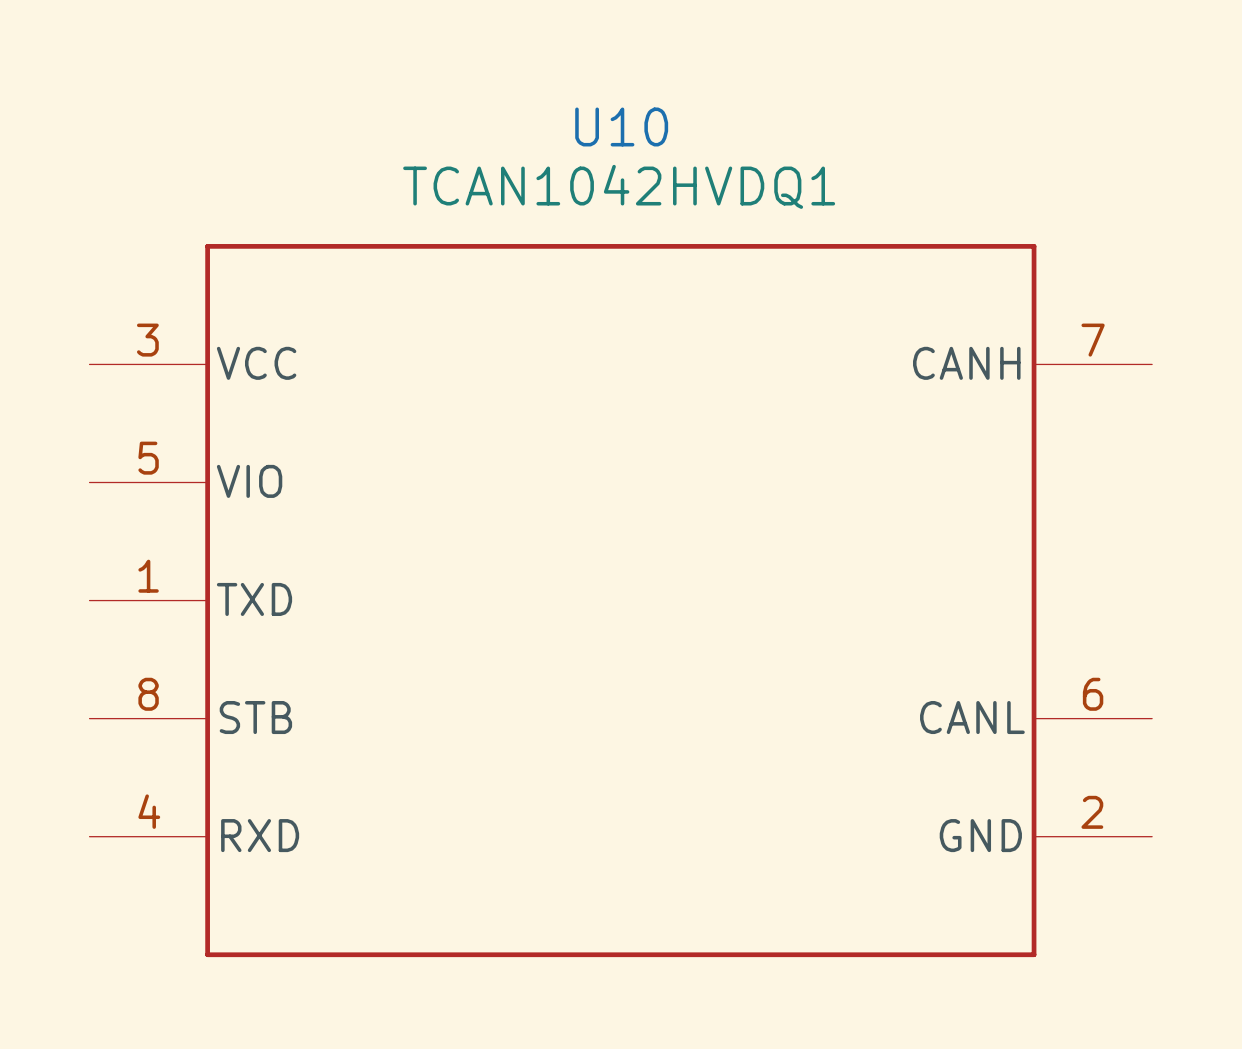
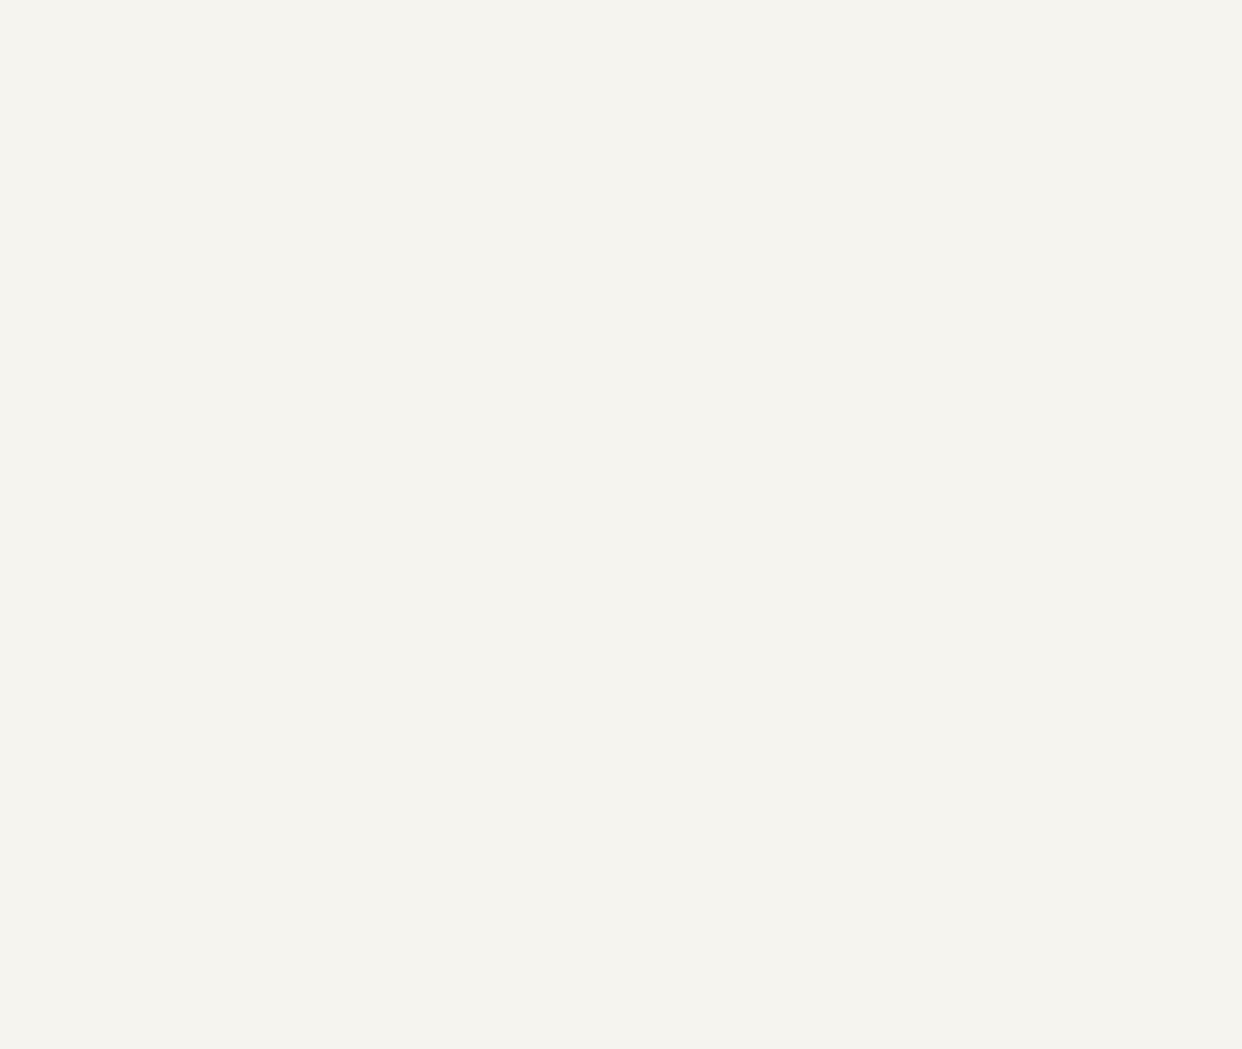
U10: TCAN1042HVDQ1 (620, 600) -> none

